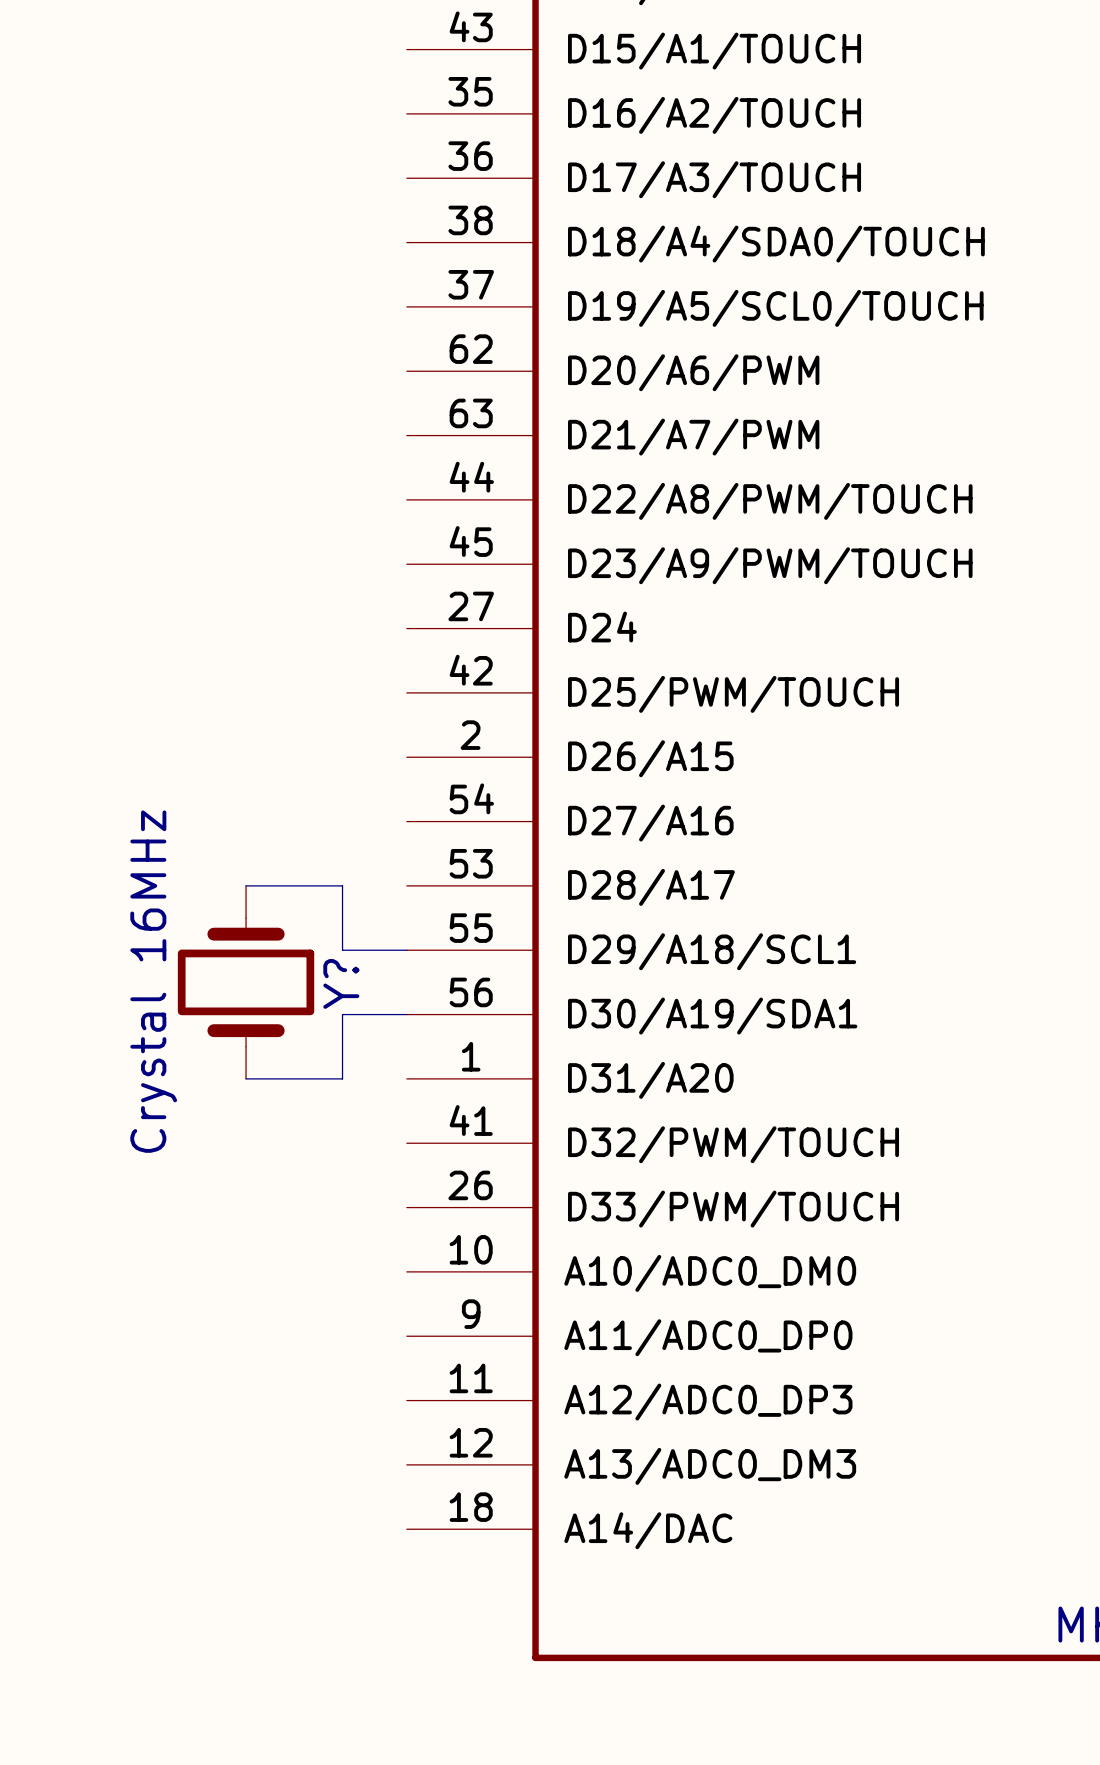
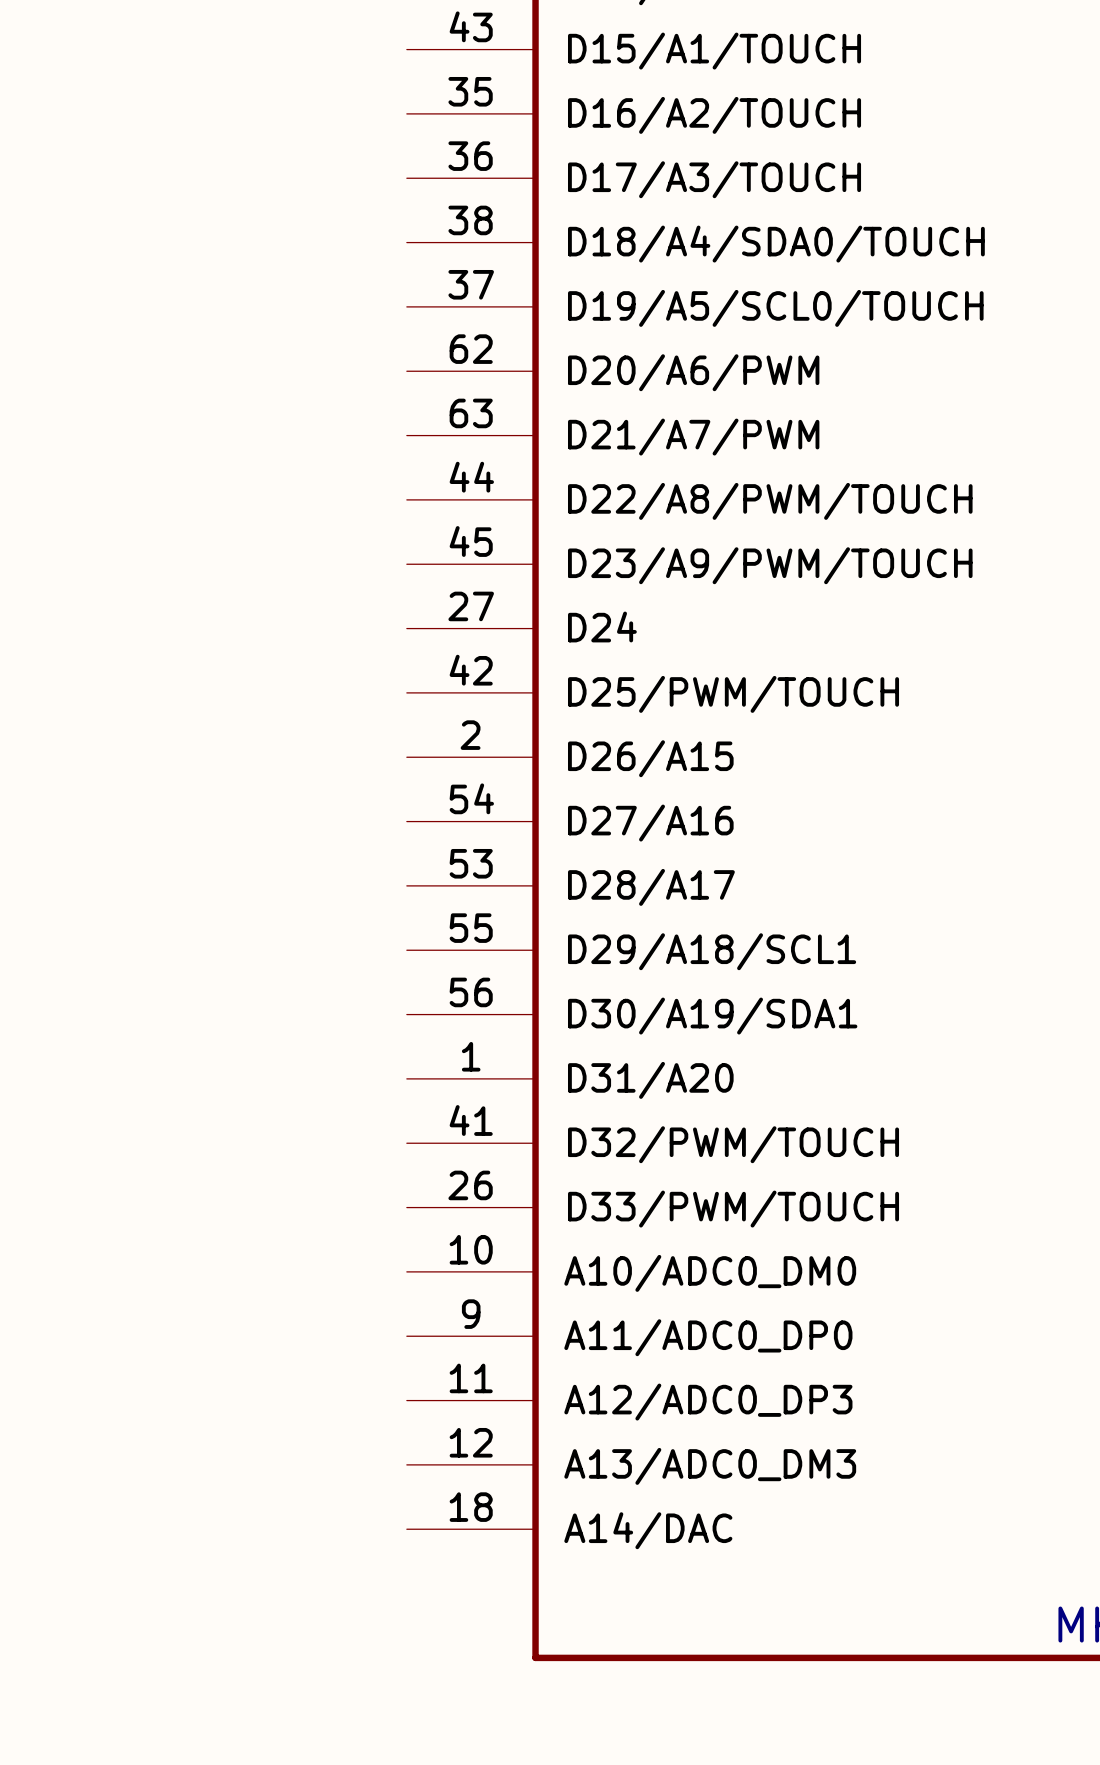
wire: (246, 885) (342, 885) (342, 950) (406, 950) -> none
Y?: Crystal 16MHz (246, 982) -> none
wire: (406, 1014) (342, 1014) (342, 1078) (246, 1078) -> none

